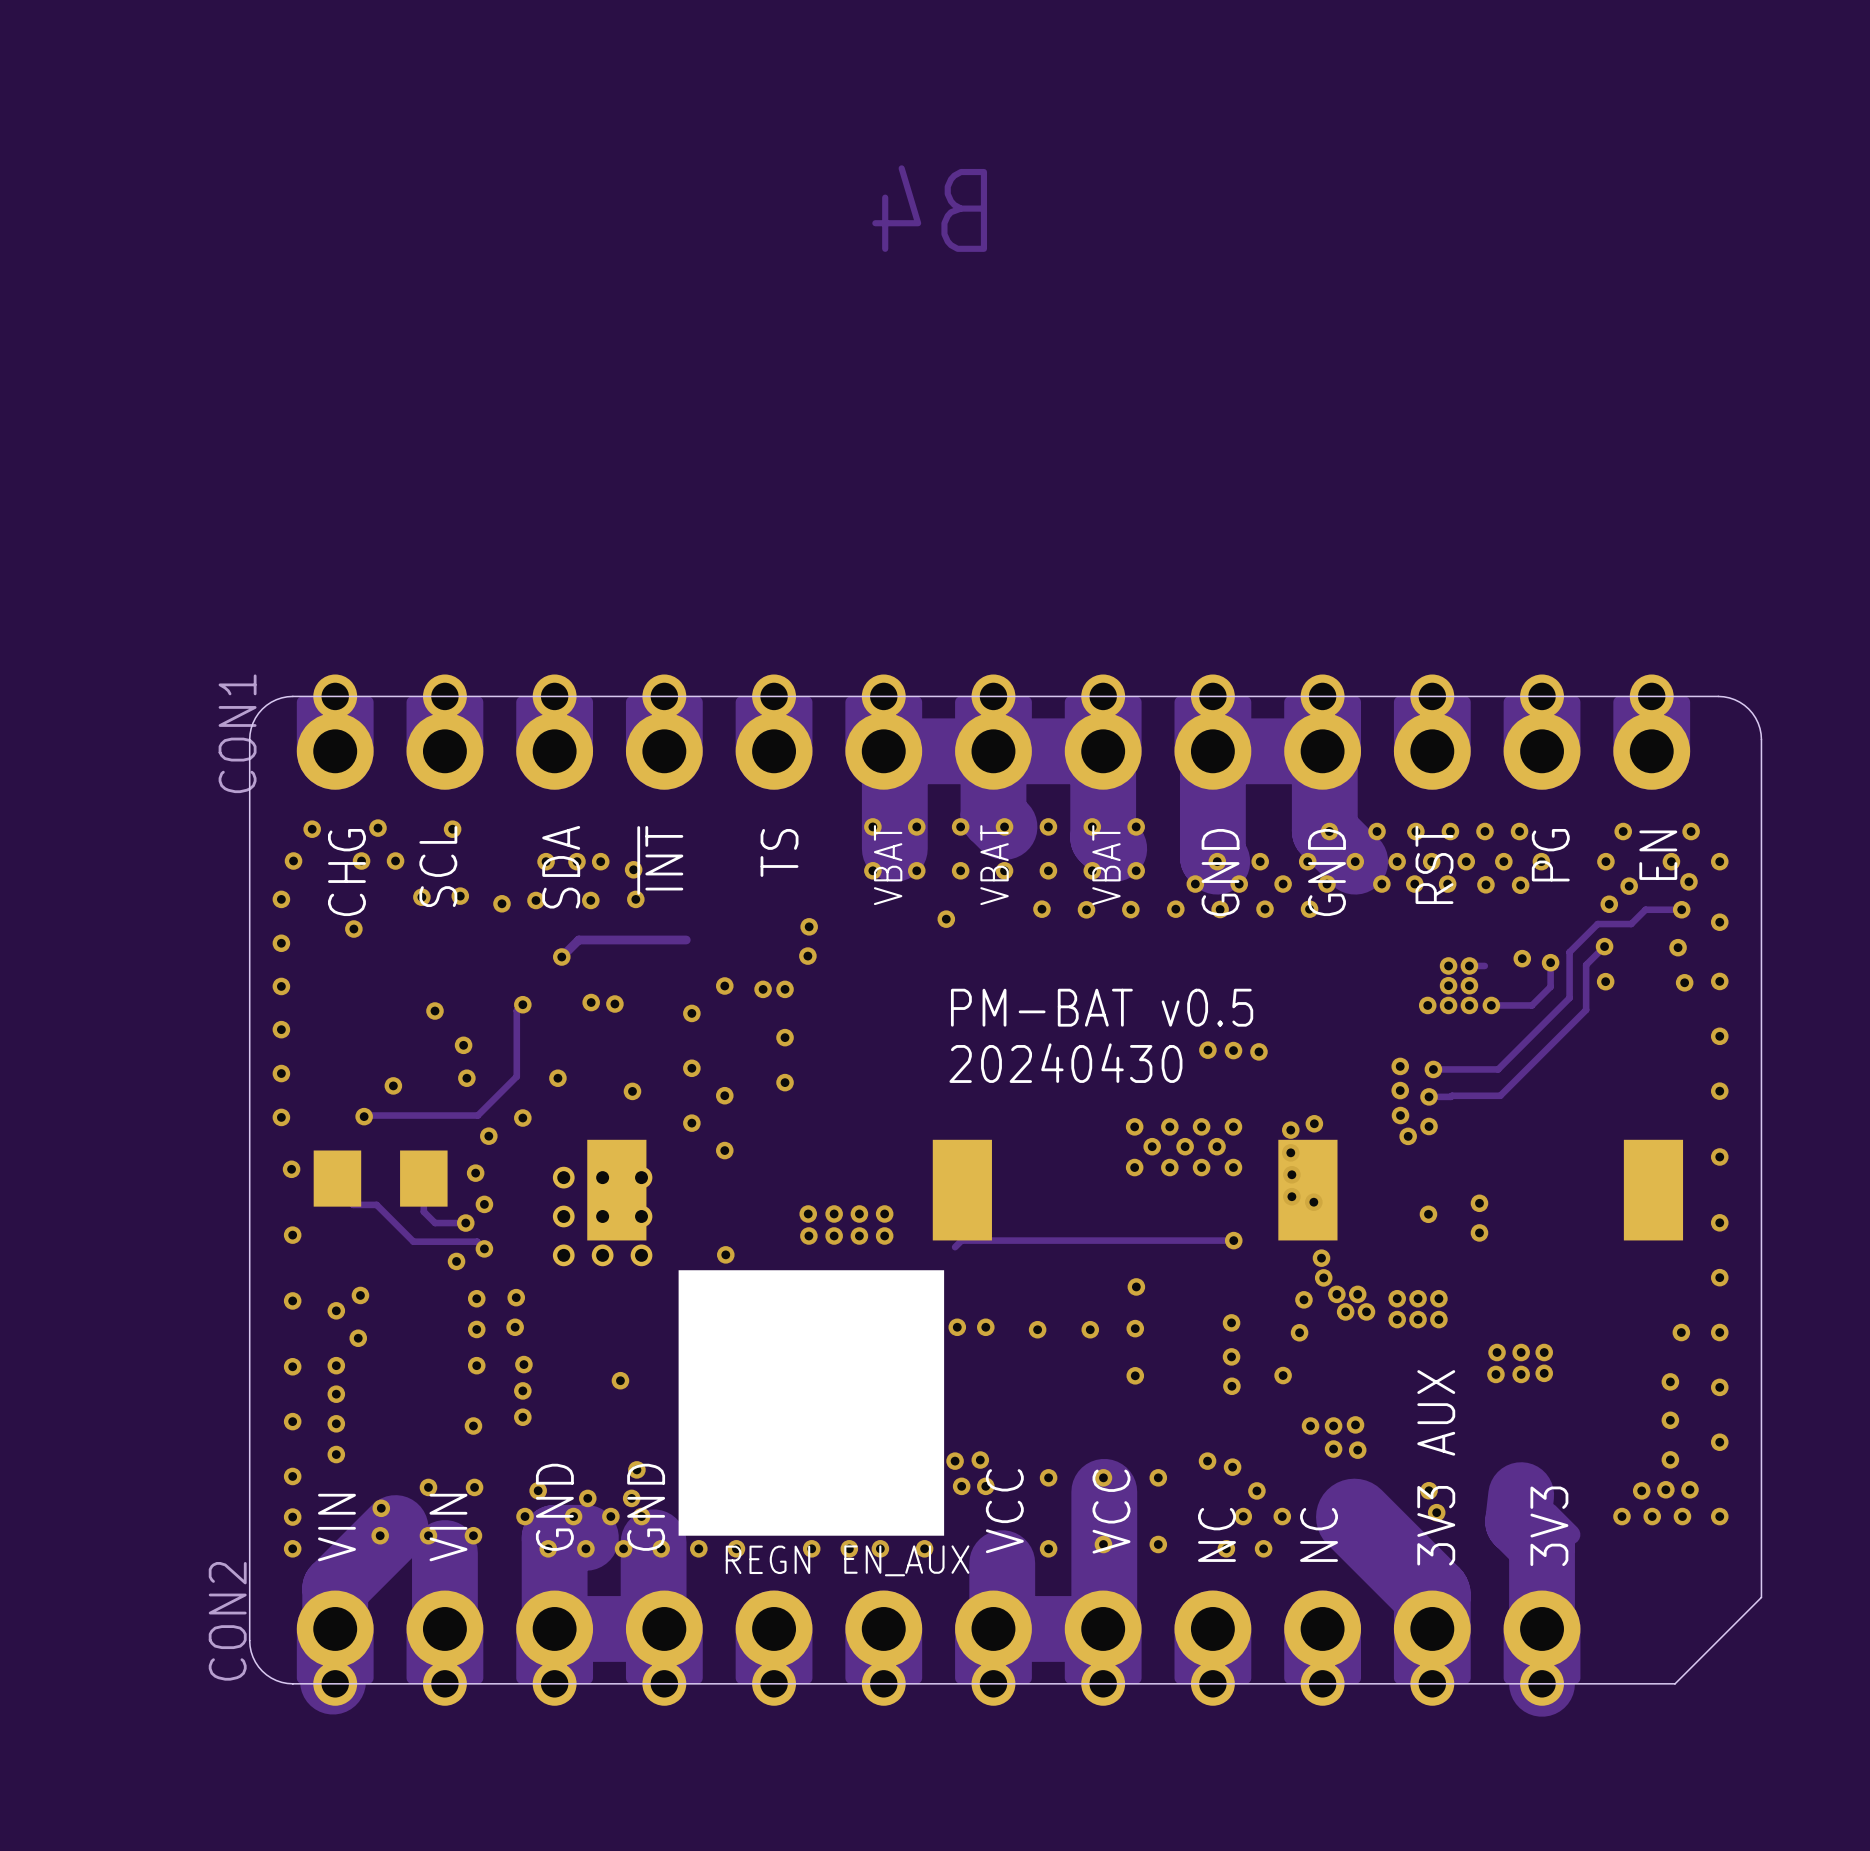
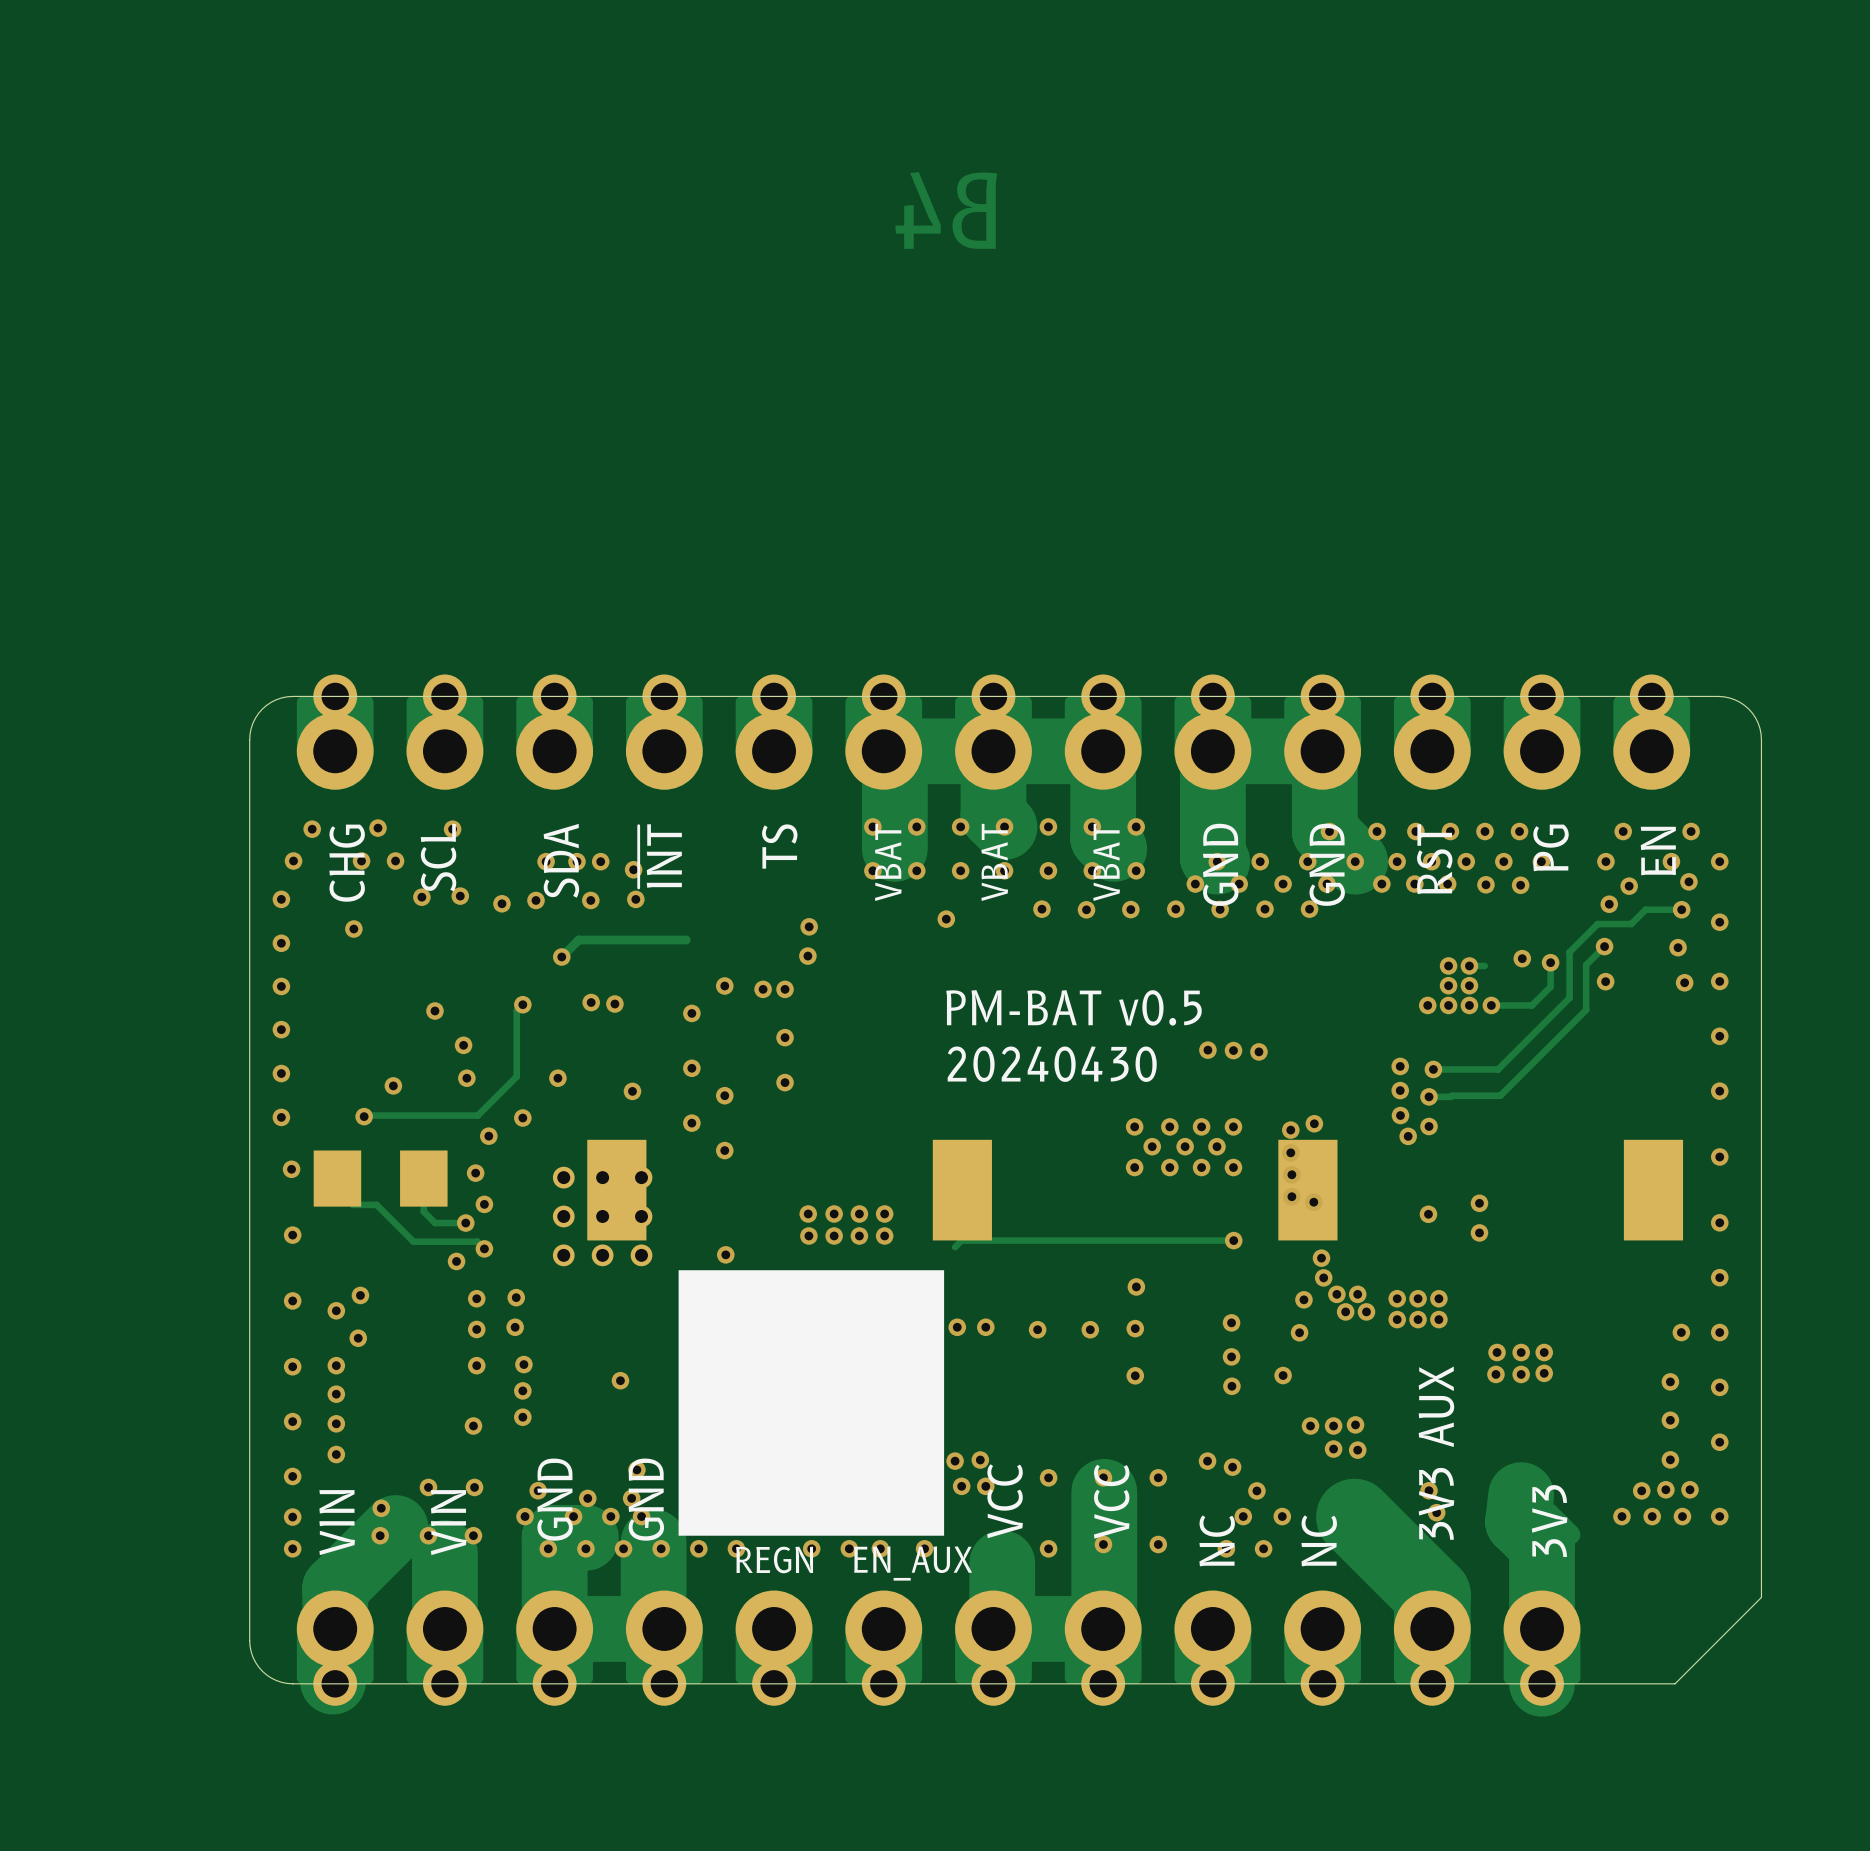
text: CON1 (237, 733) -> none
text: CON2 (227, 1621) -> none

